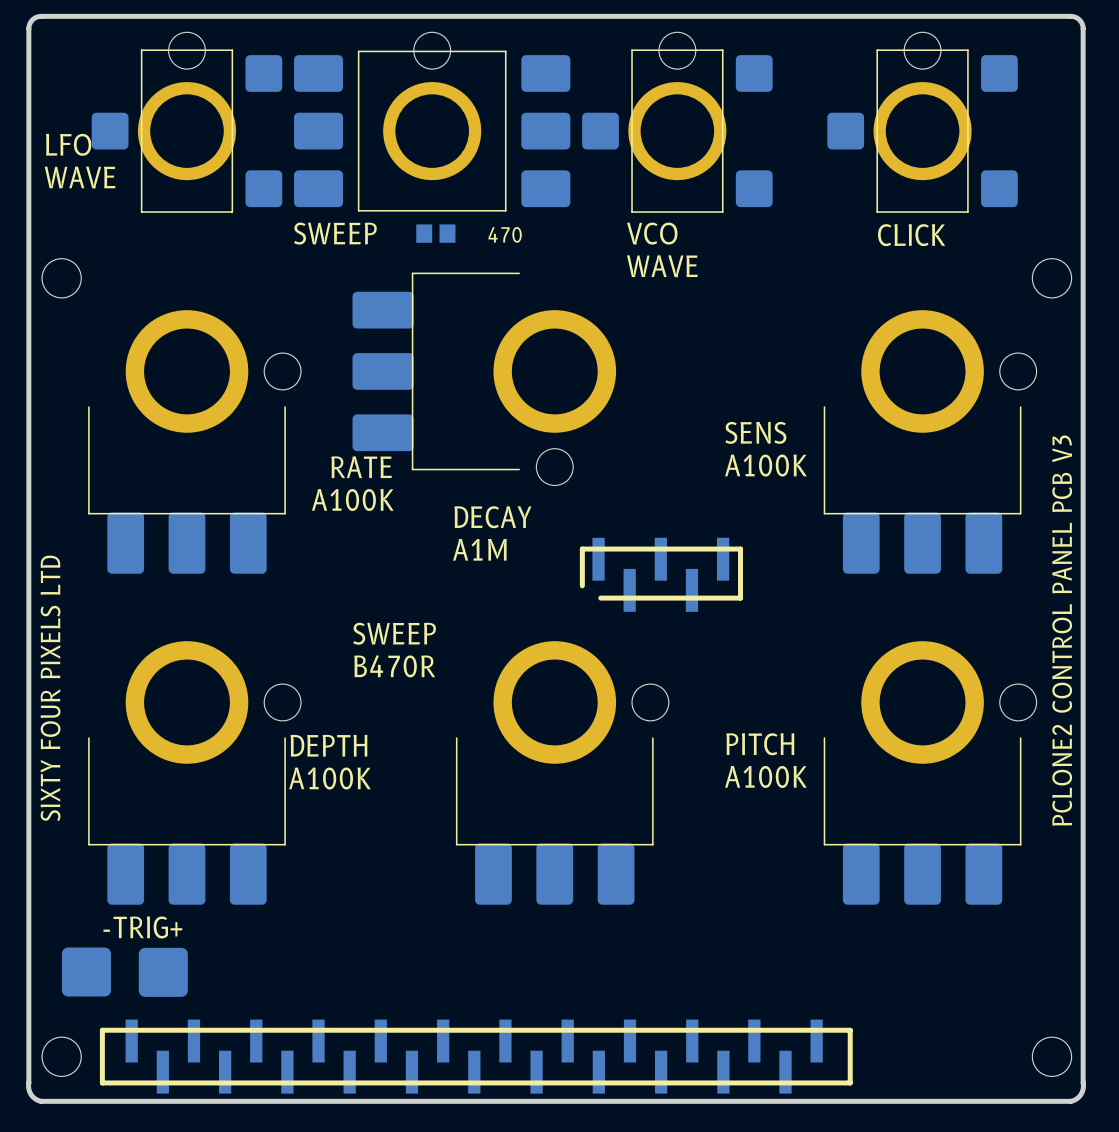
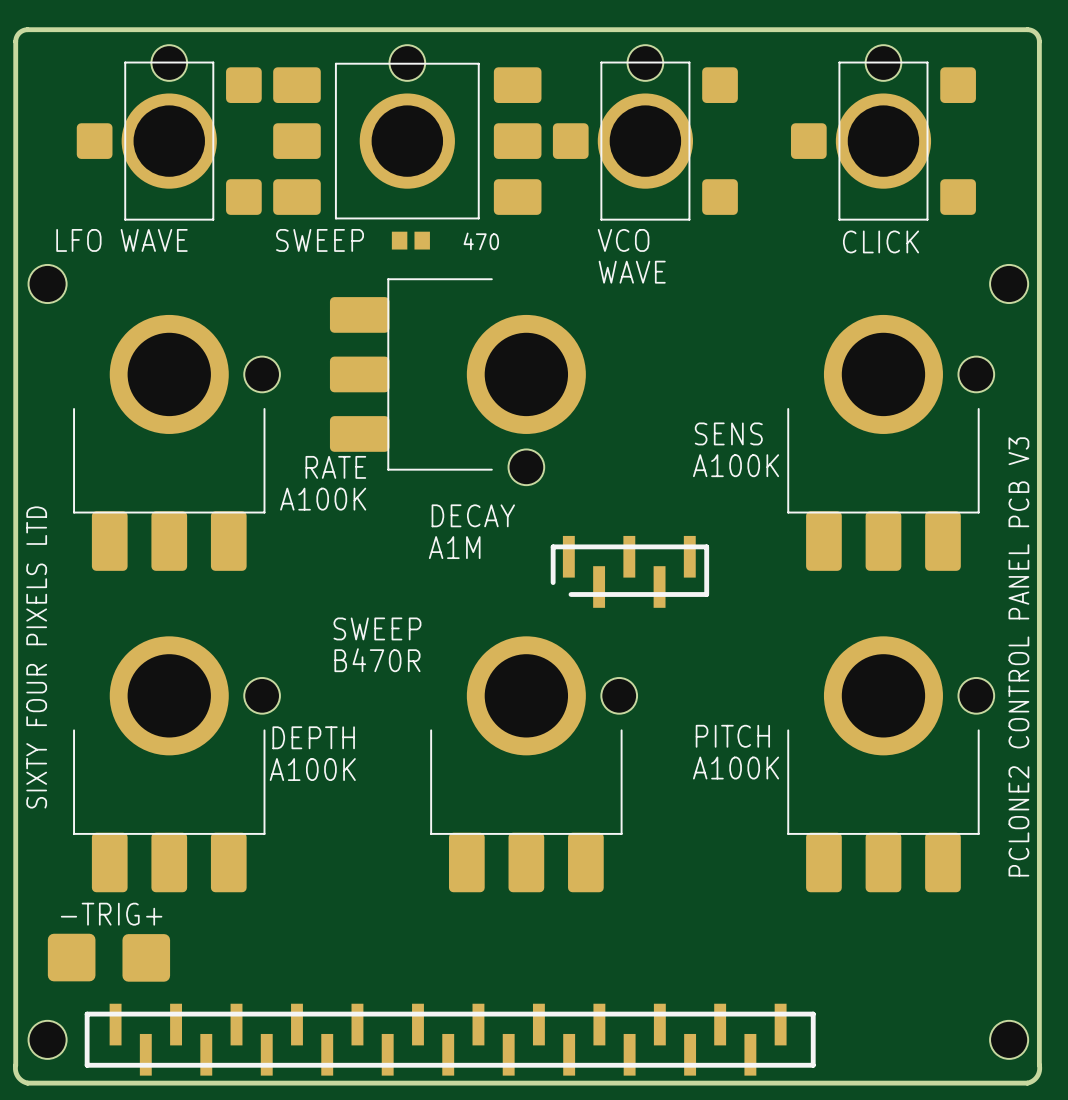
text: LFO (68, 144) -> none
text: WAVE (80, 177) -> none
text: none -> LFO WAVE (121, 240)

